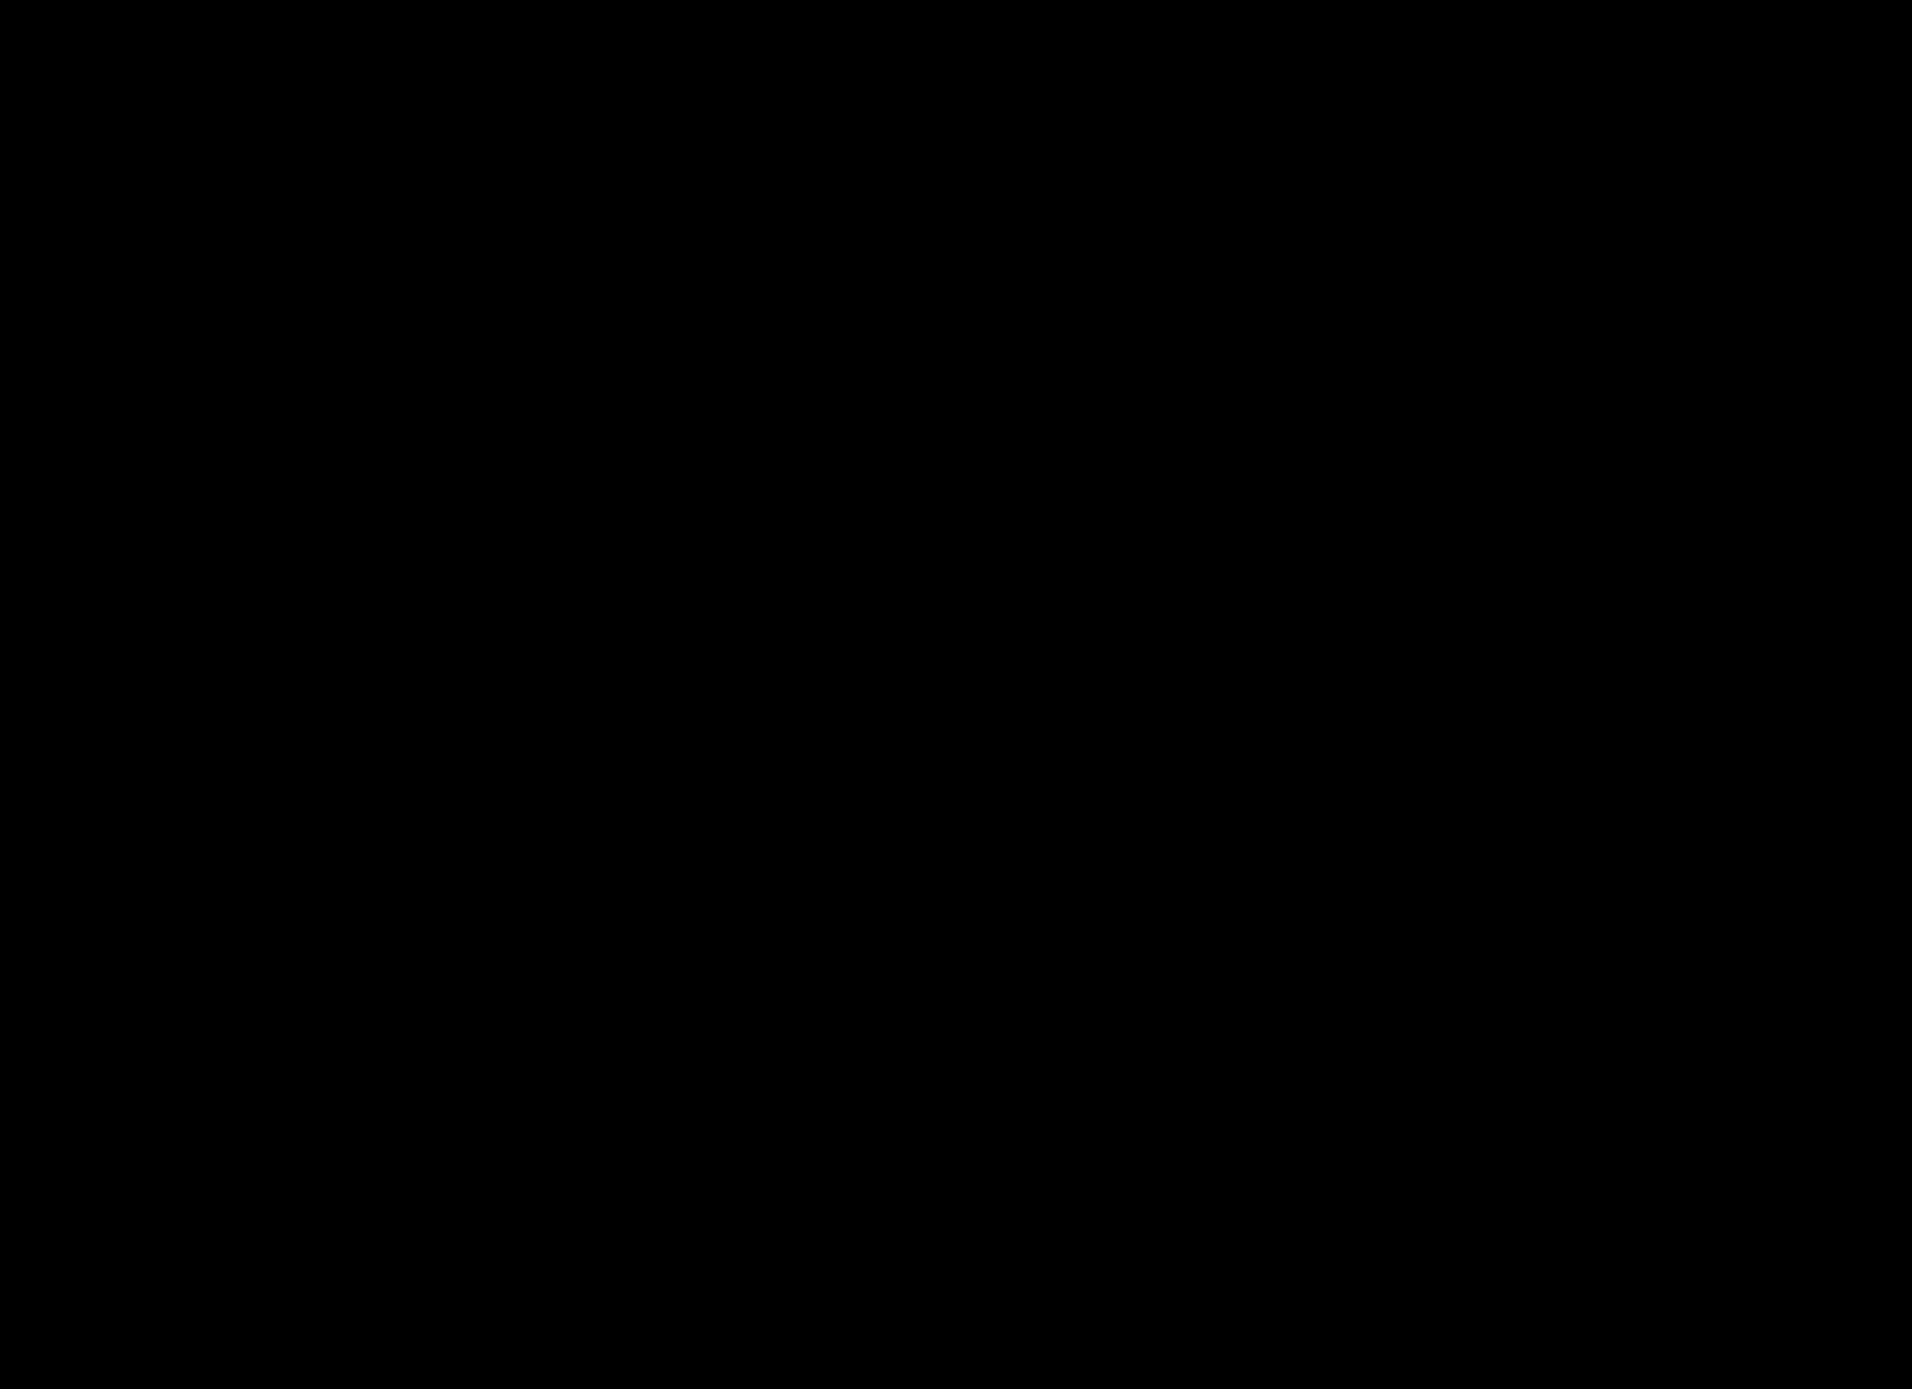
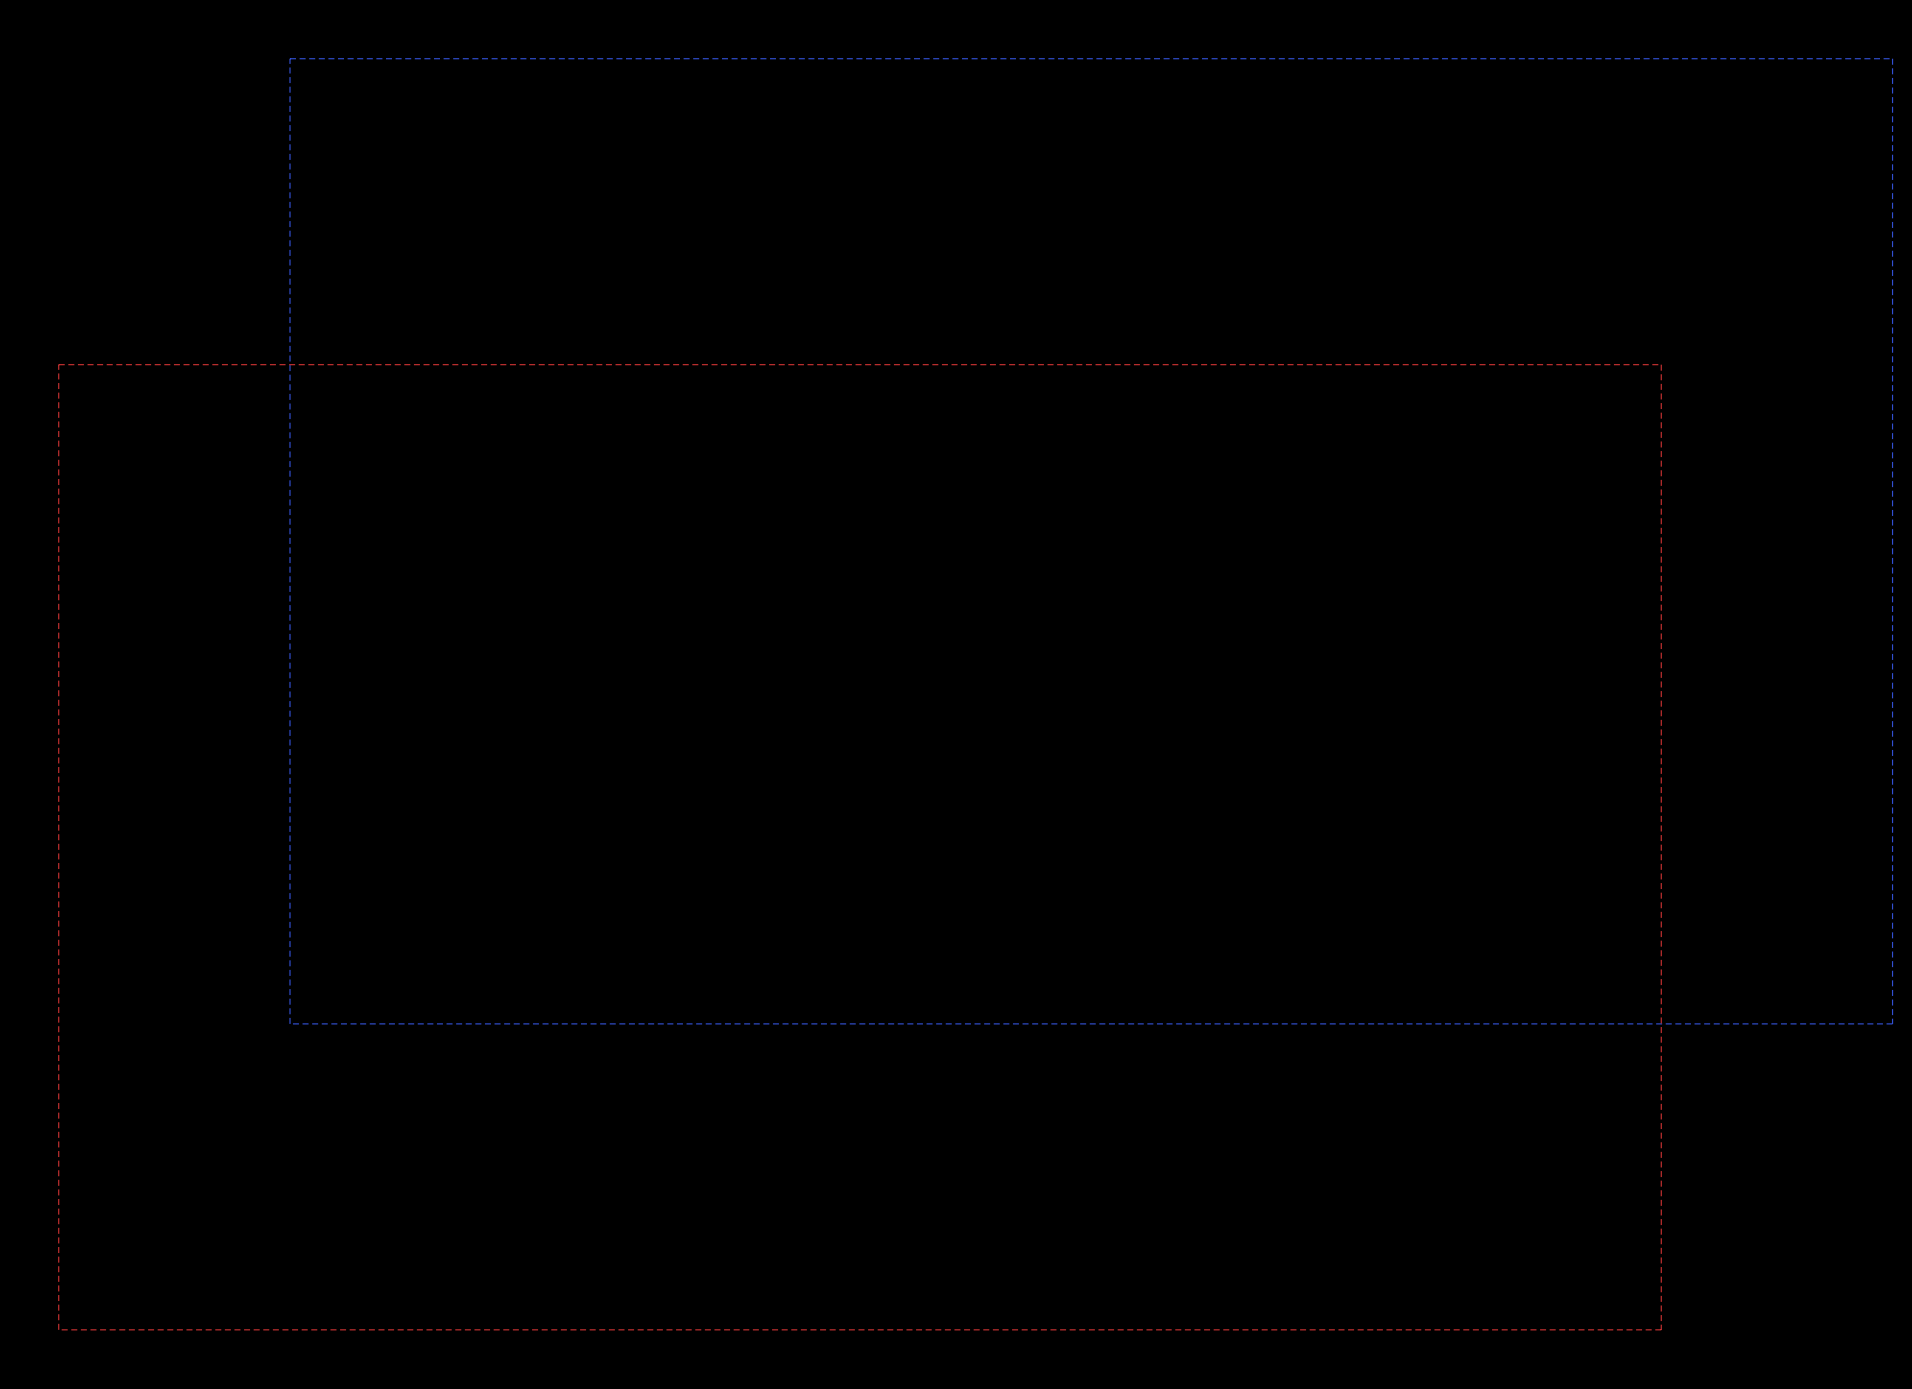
bottom zone outline: none -> (290, 58) (290, 1023) (1892, 1023) (1892, 58) (290, 58)
top zone outline: none -> (58, 364) (58, 1329) (1661, 1329) (1661, 364) (58, 364)

